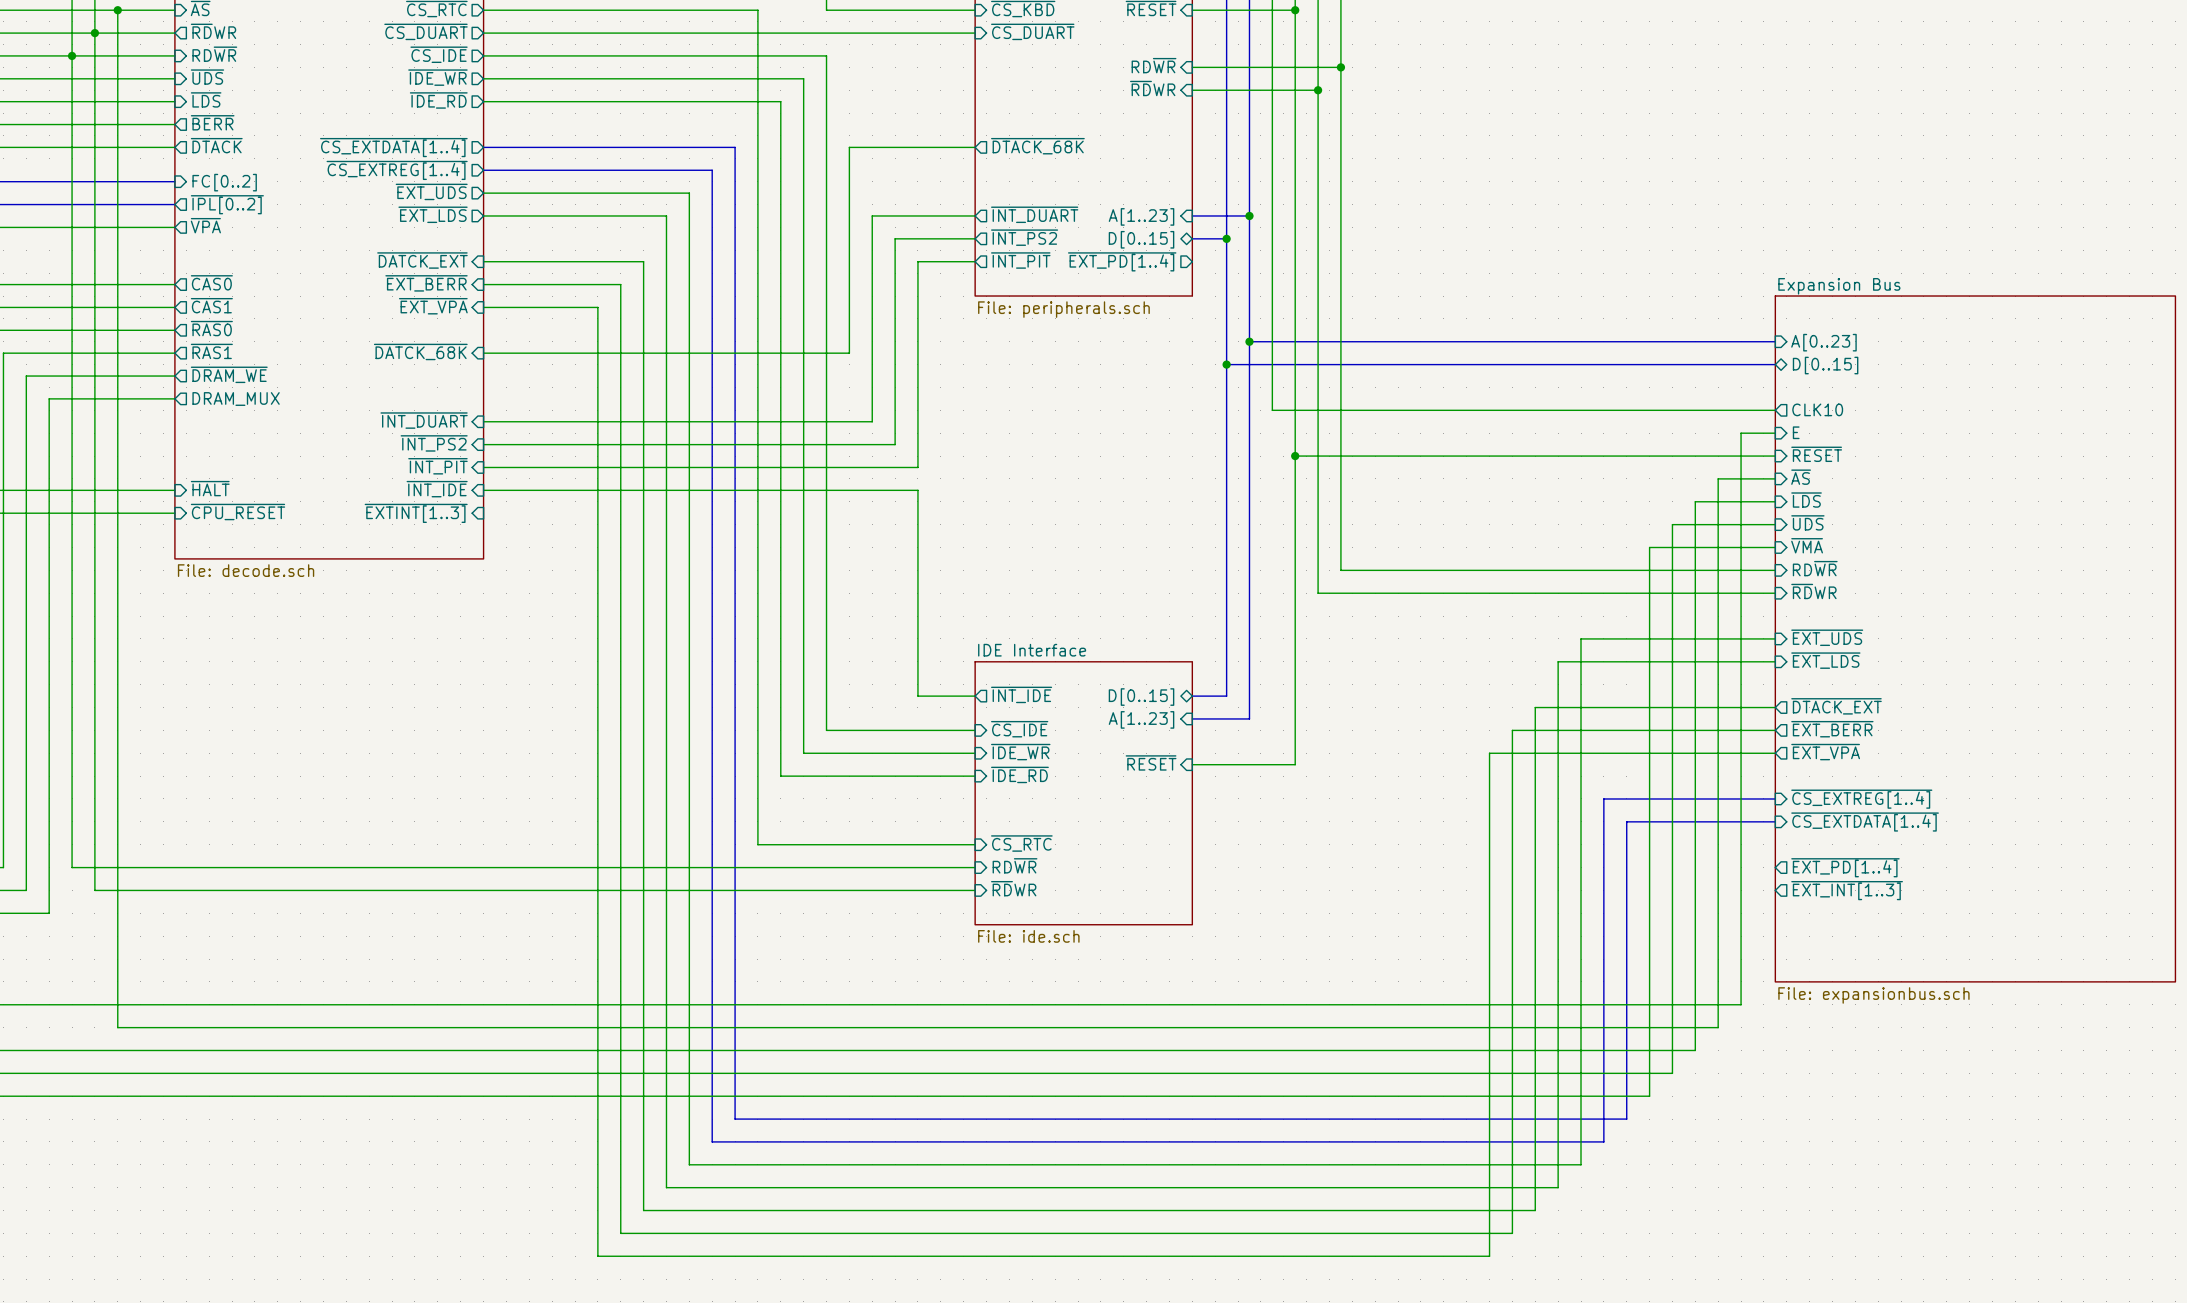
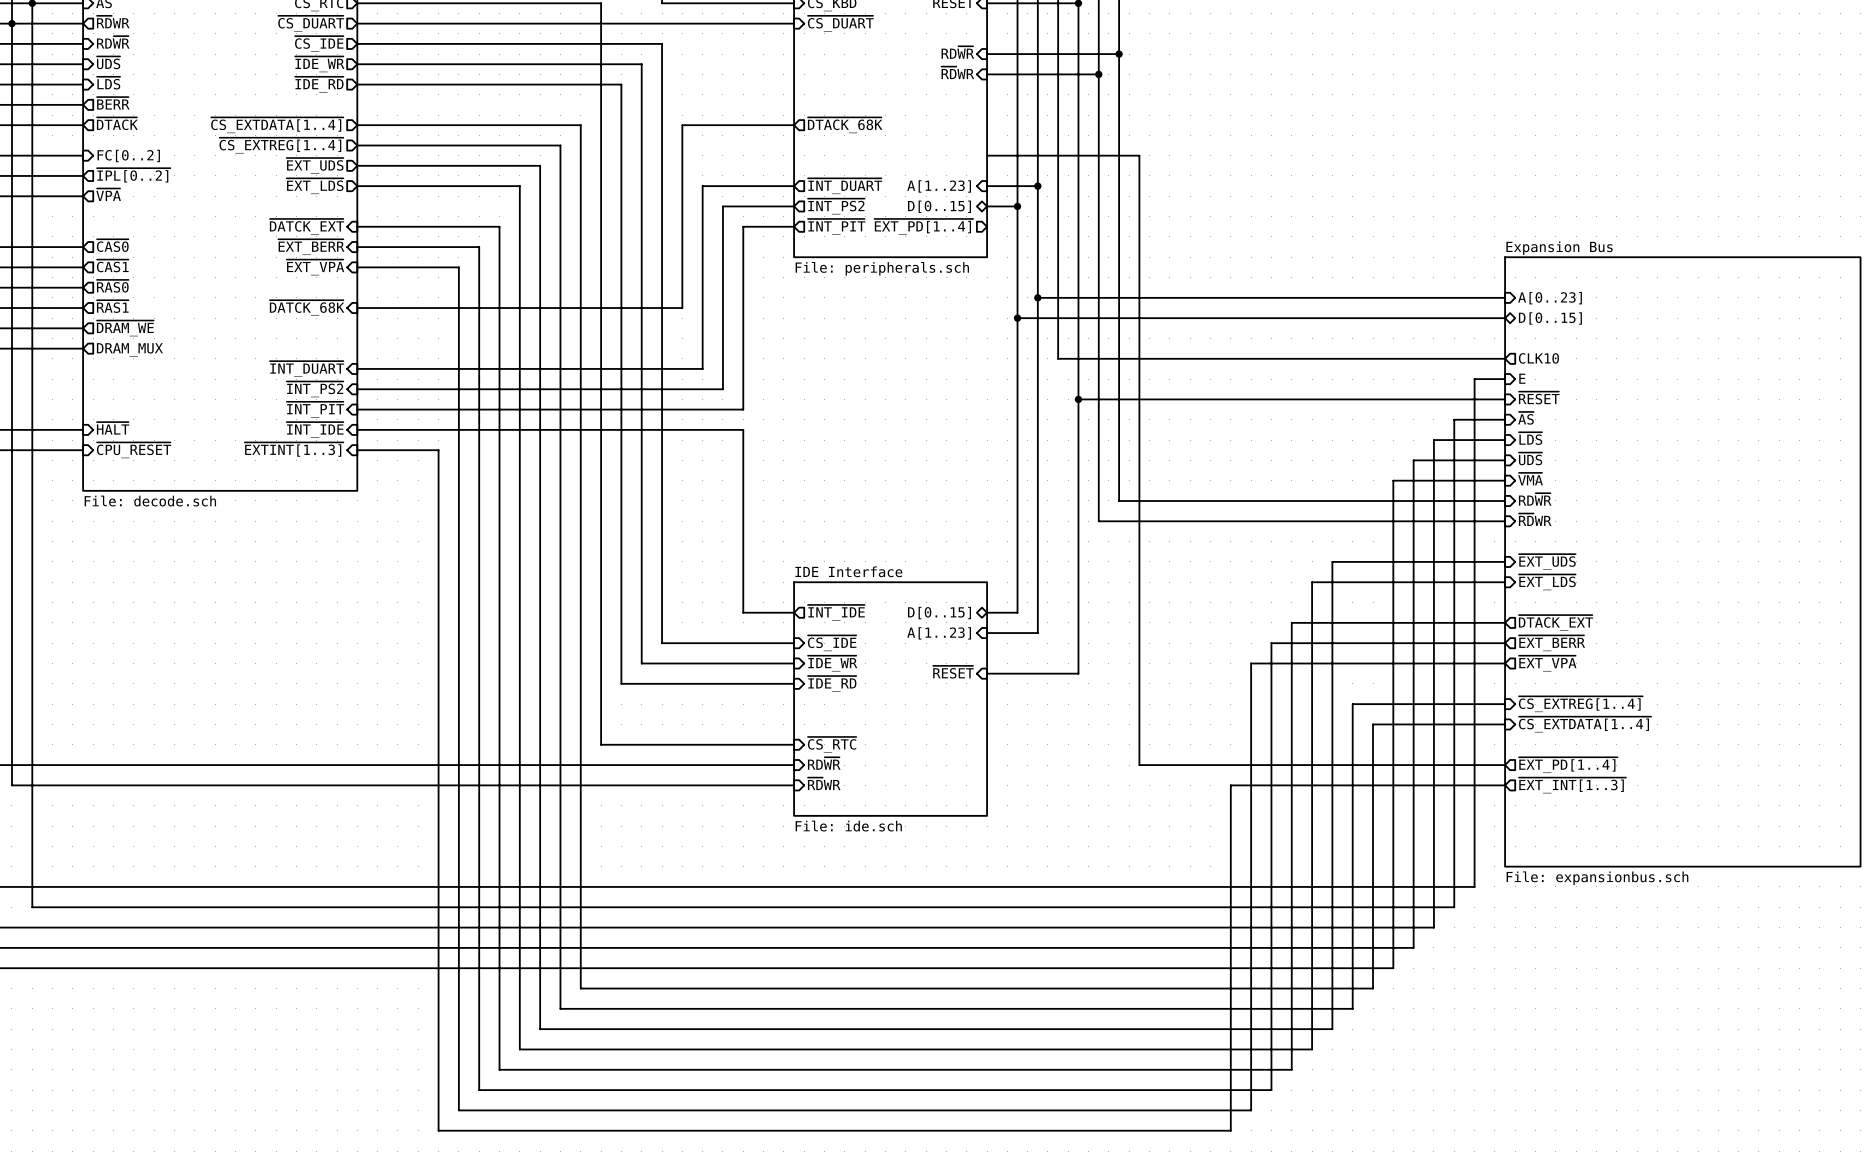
bus: none -> (987, 155) (1139, 155) (1139, 765) (1505, 765)
bus: none -> (357, 450) (438, 450) (438, 1130) (1230, 1130) (1230, 785) (1505, 785)

